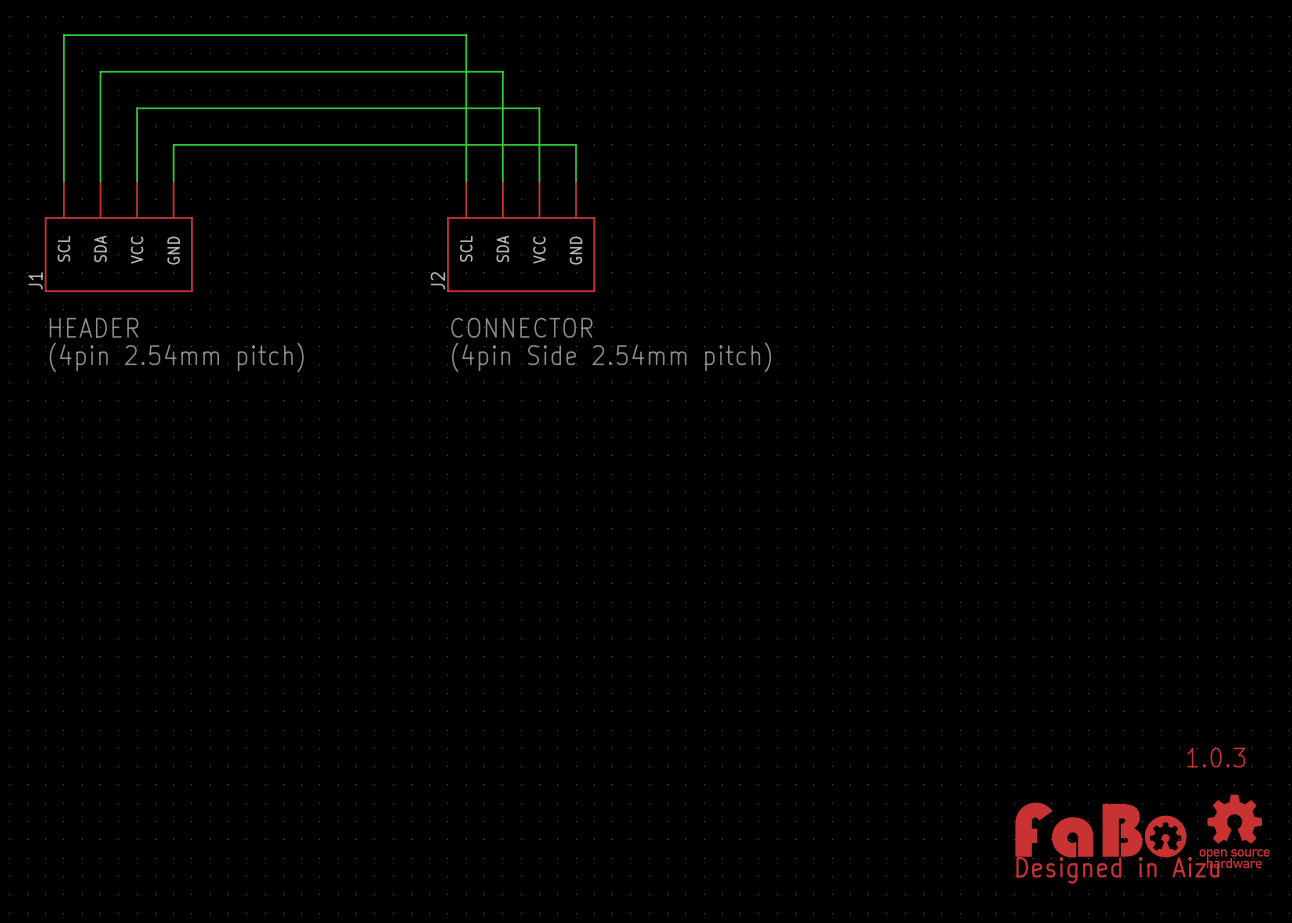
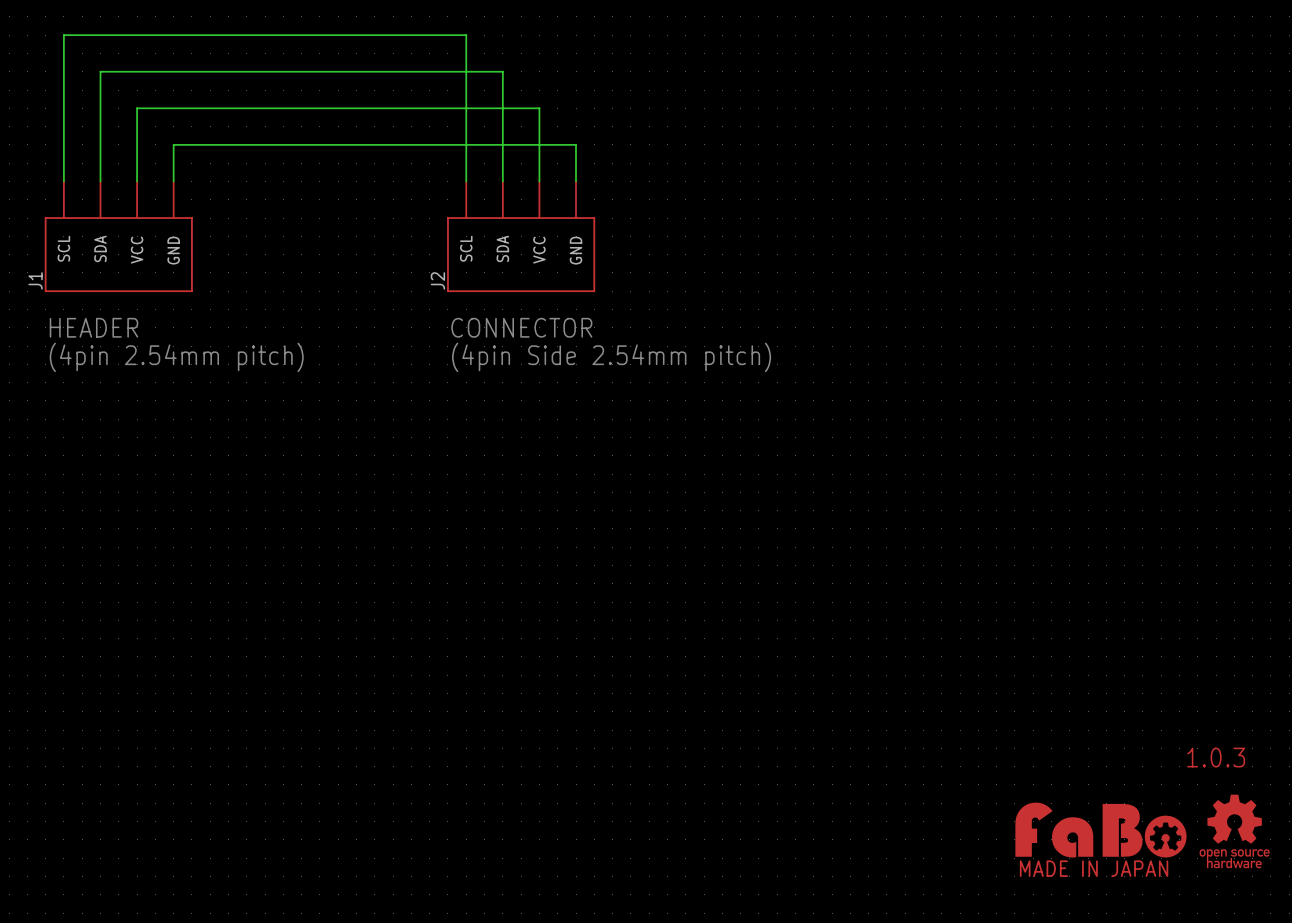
part text: none -> MADE IN JAPAN (1094, 868)
part text: Designed in Aizu (1117, 870) -> none

